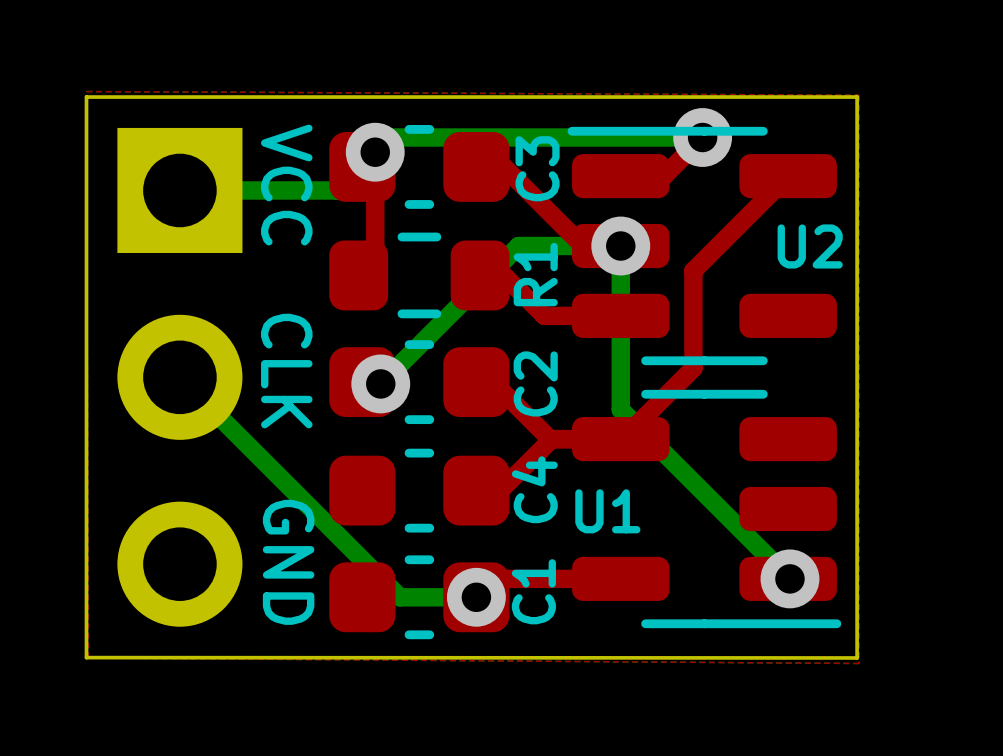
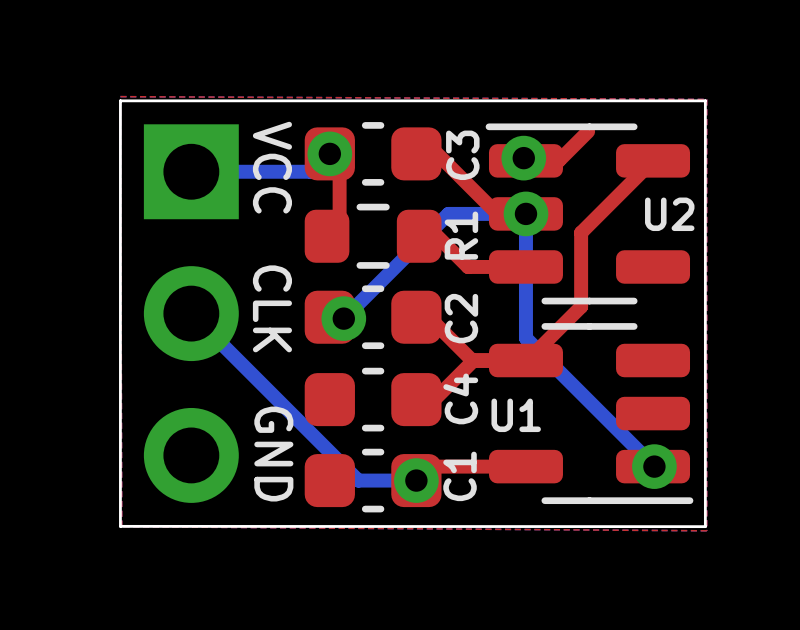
bottom track: (702, 137) (389, 137) (375, 152) -> none
via position: (702, 137) -> (523, 158)
via position: (375, 152) -> (329, 153)

